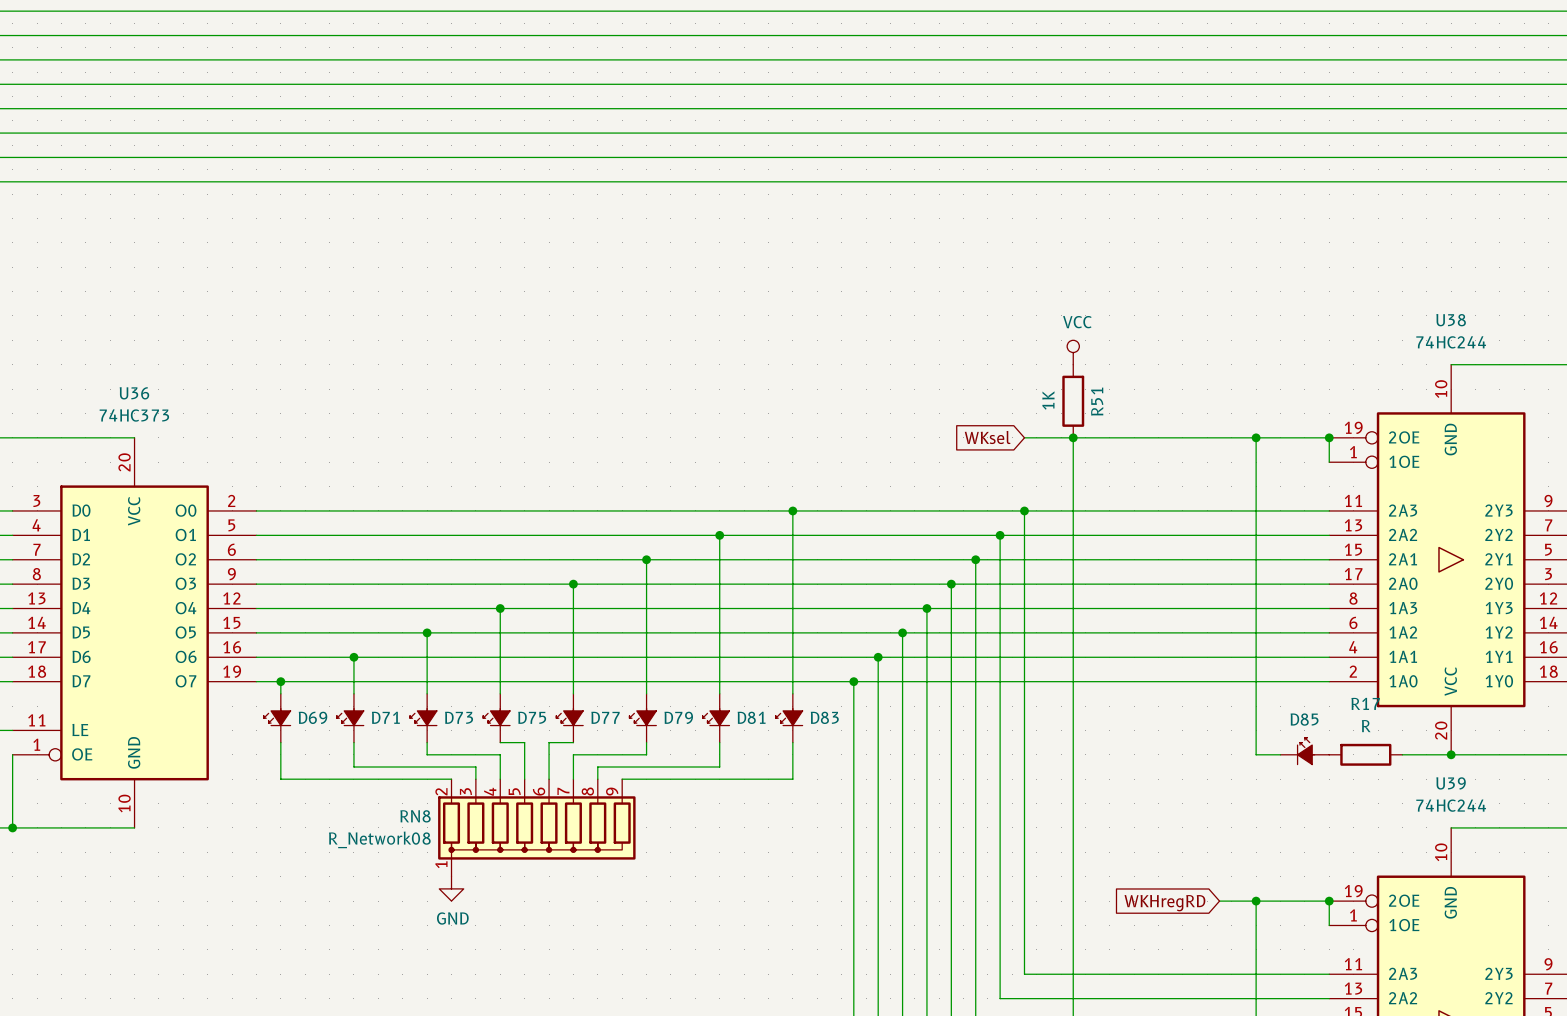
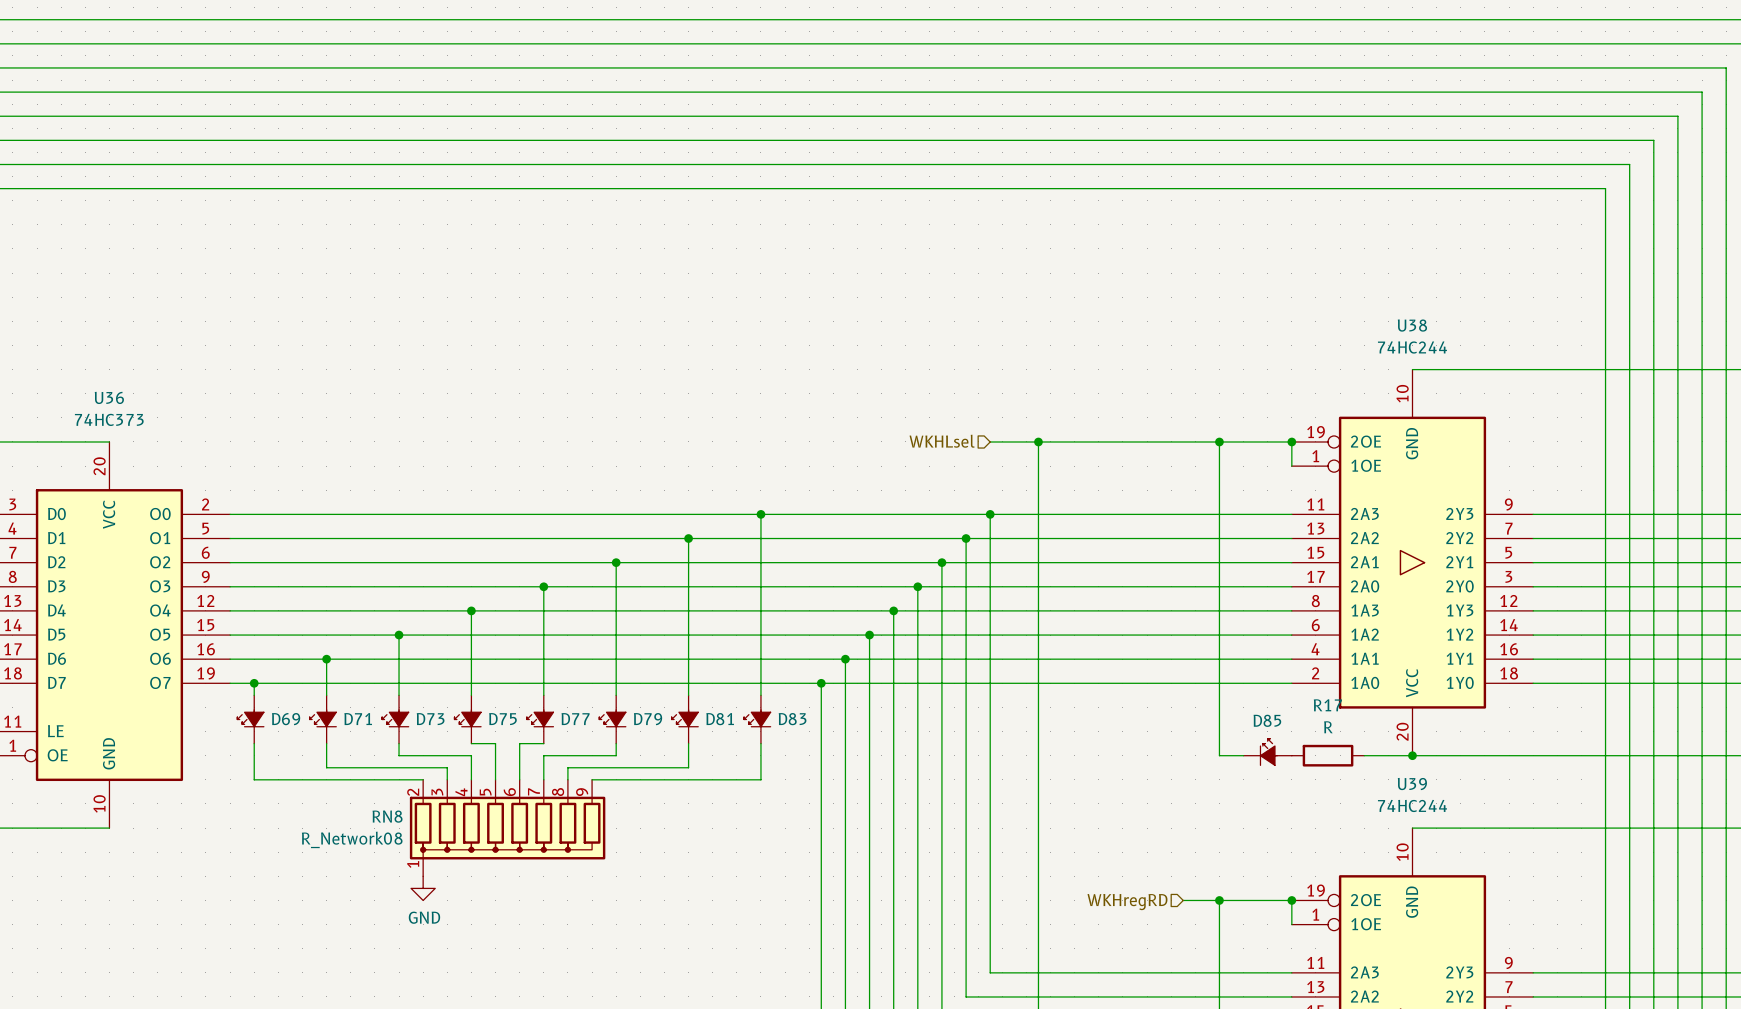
power symbol: VCC (1073, 352) -> none
R51: 1K (1073, 401) -> none
hierarchical label: none -> WKHLsel (942, 441)
global label: WKsel (987, 437) -> none
hierarchical label: none -> WKHregRD (1127, 902)
global label: WKHregRD (1164, 903) -> none

